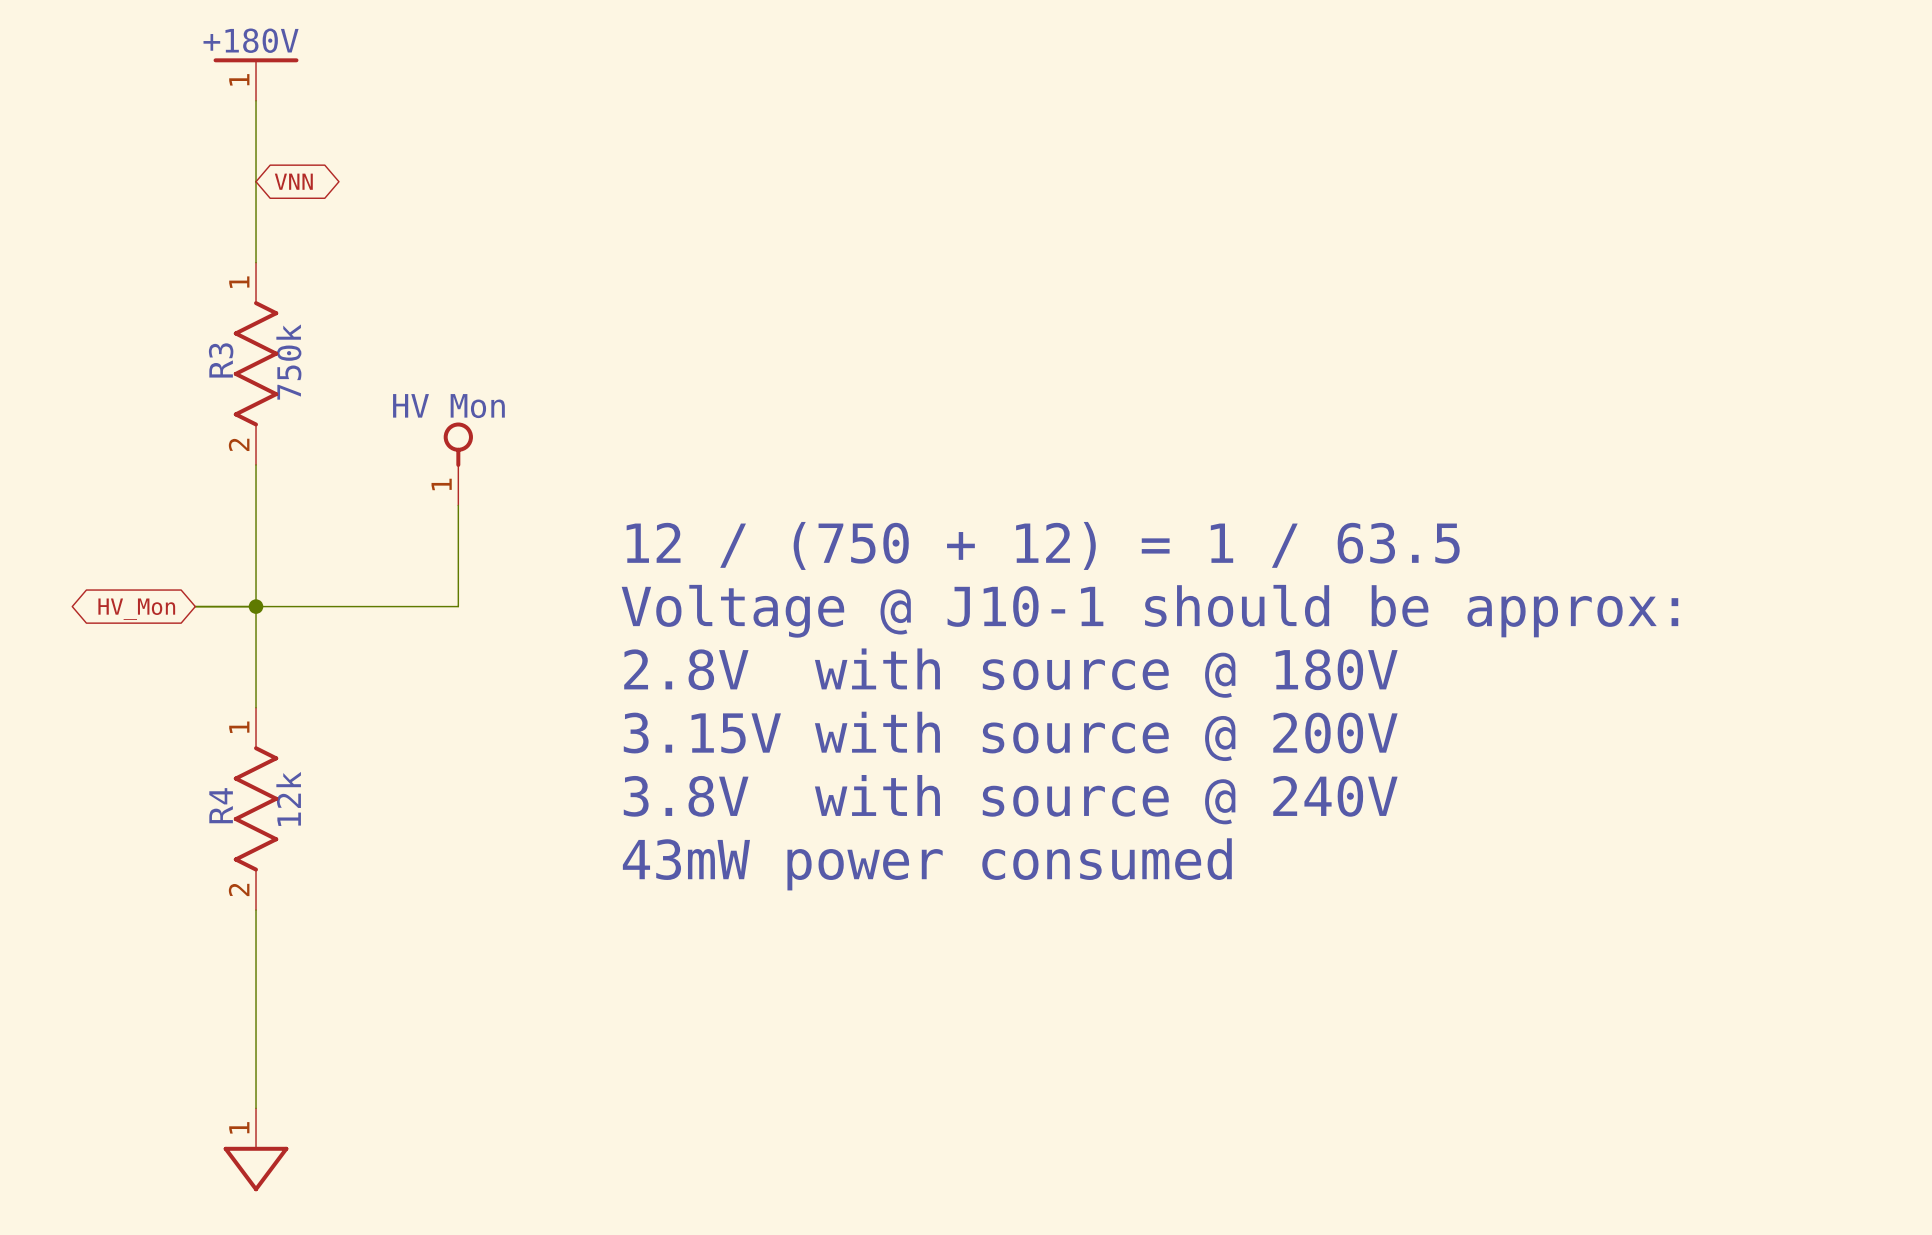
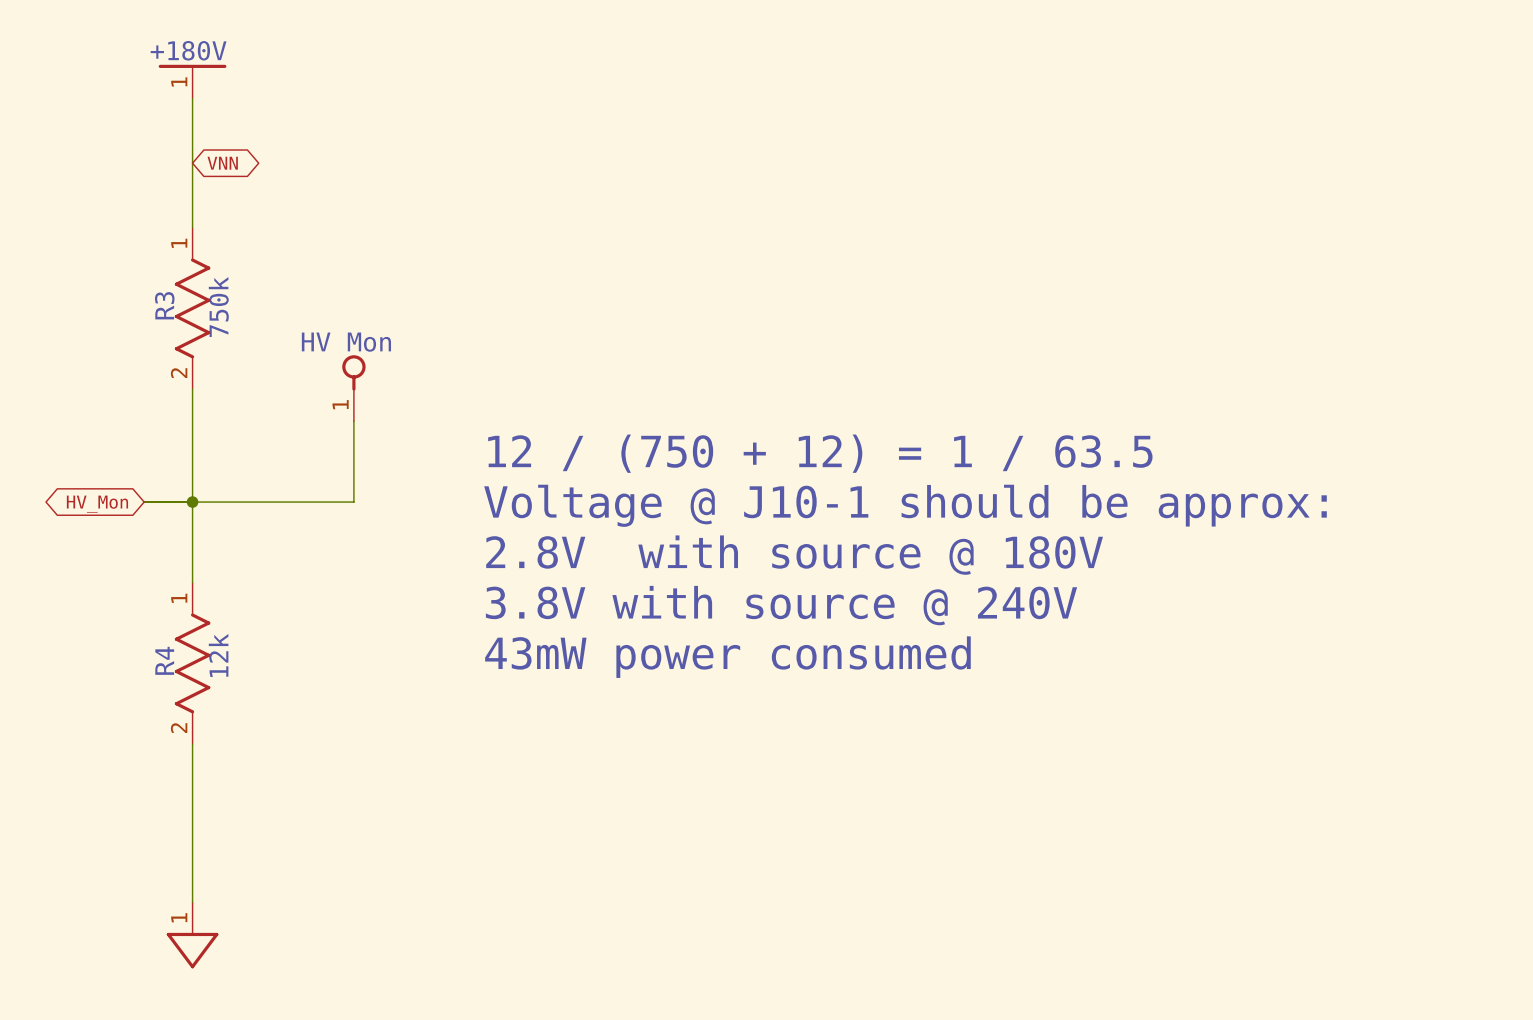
text: 3.15V with source @ 200V (1010, 736) -> 3.8V with source @ 240V (781, 605)
text: 3.8V with source @ 240V (1010, 799) -> 43mW power consumed (727, 657)
text: 43mW power consumed (927, 864) -> none

